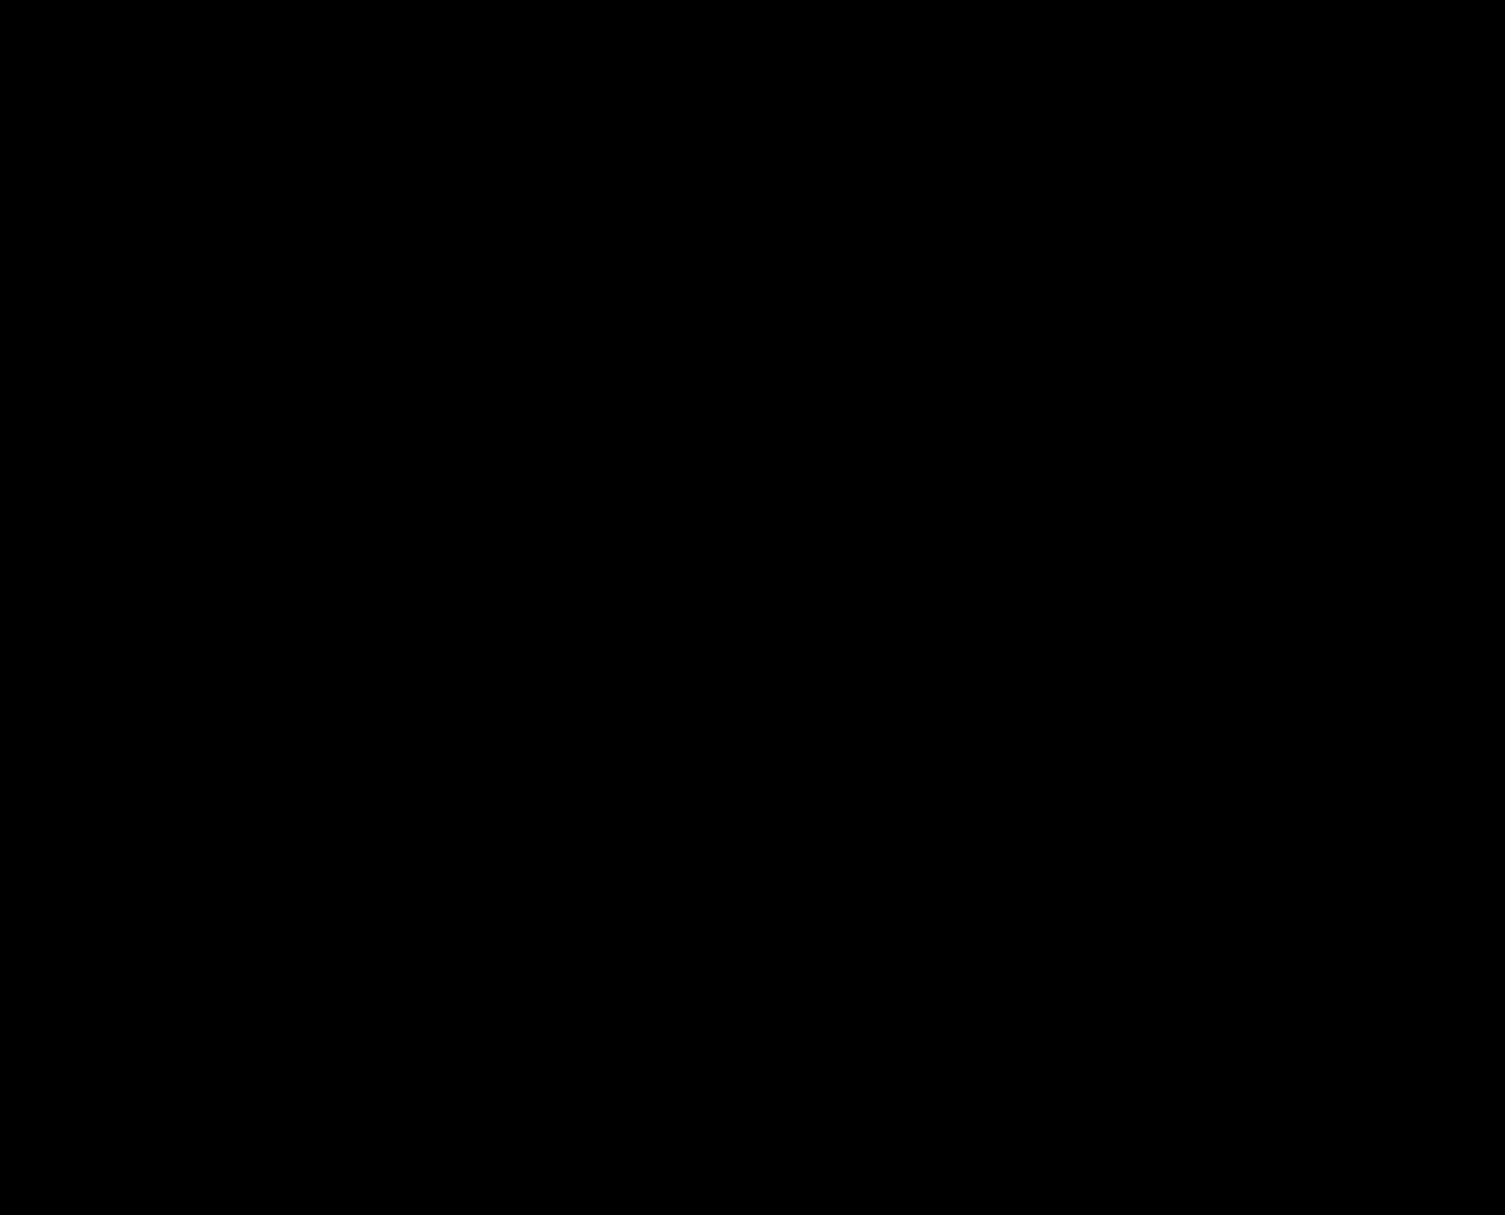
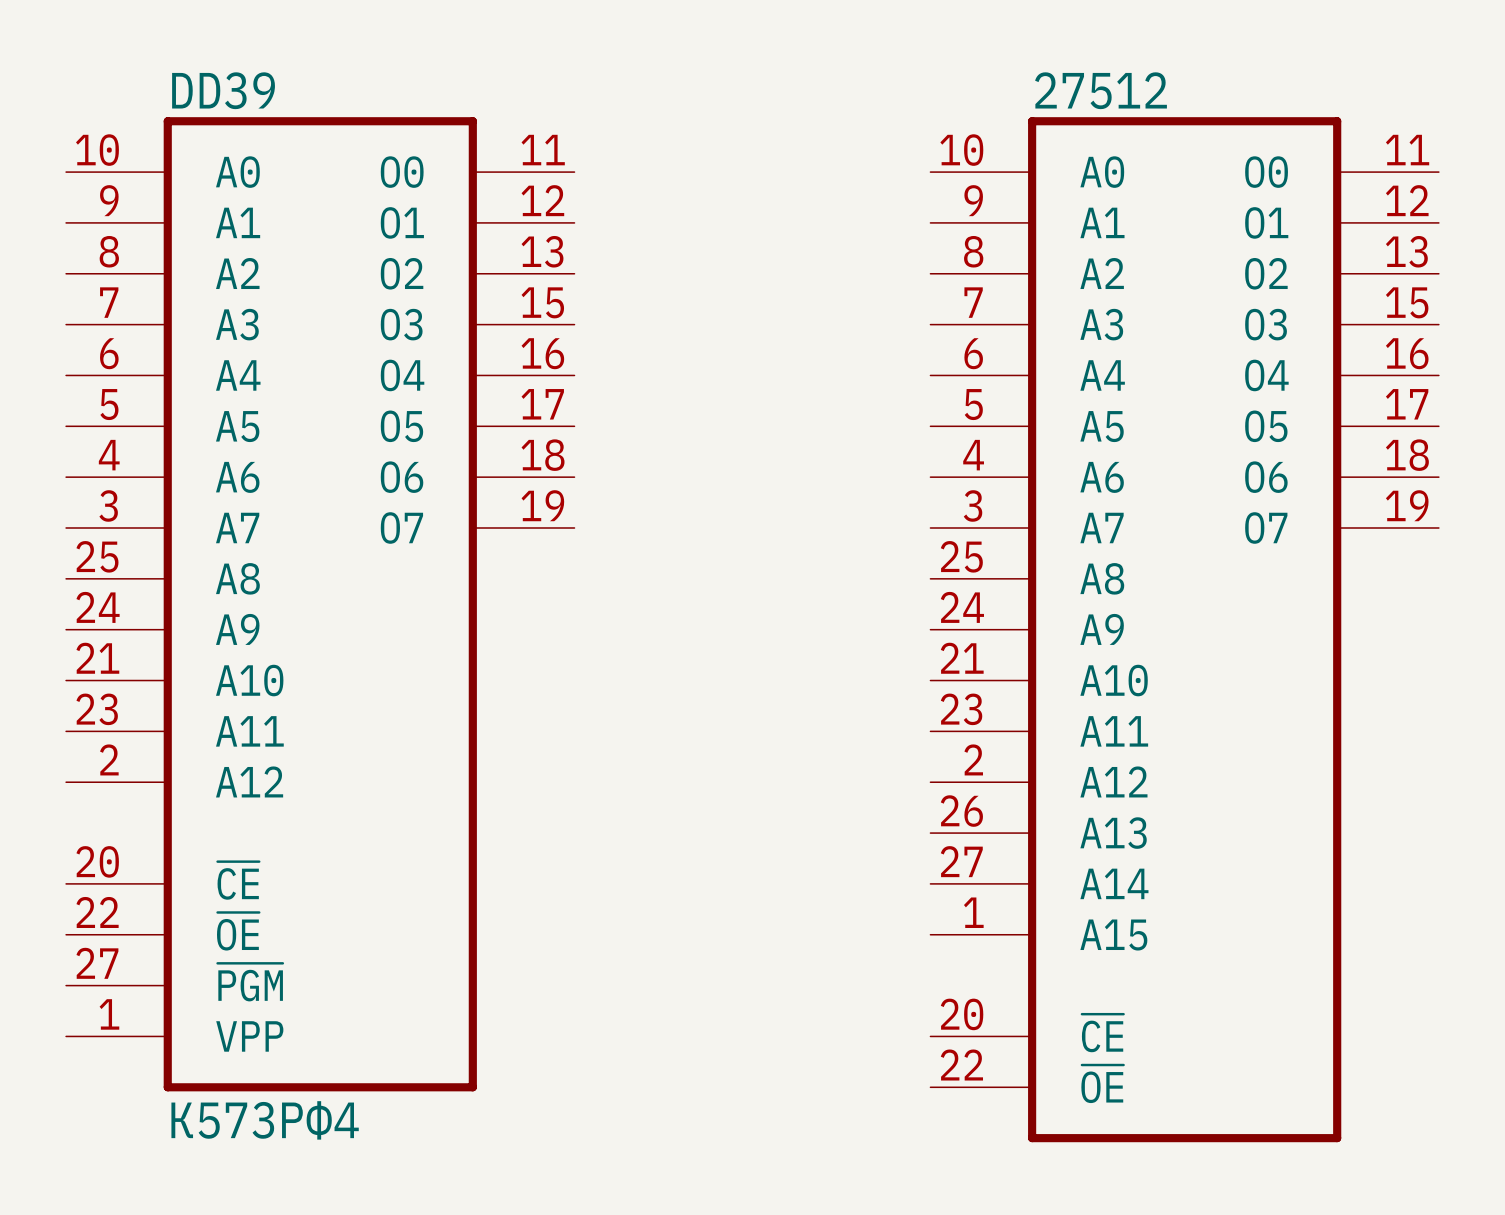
DD39: none -> К573РФ4 (320, 604)
27512: none -> (1184, 629)

